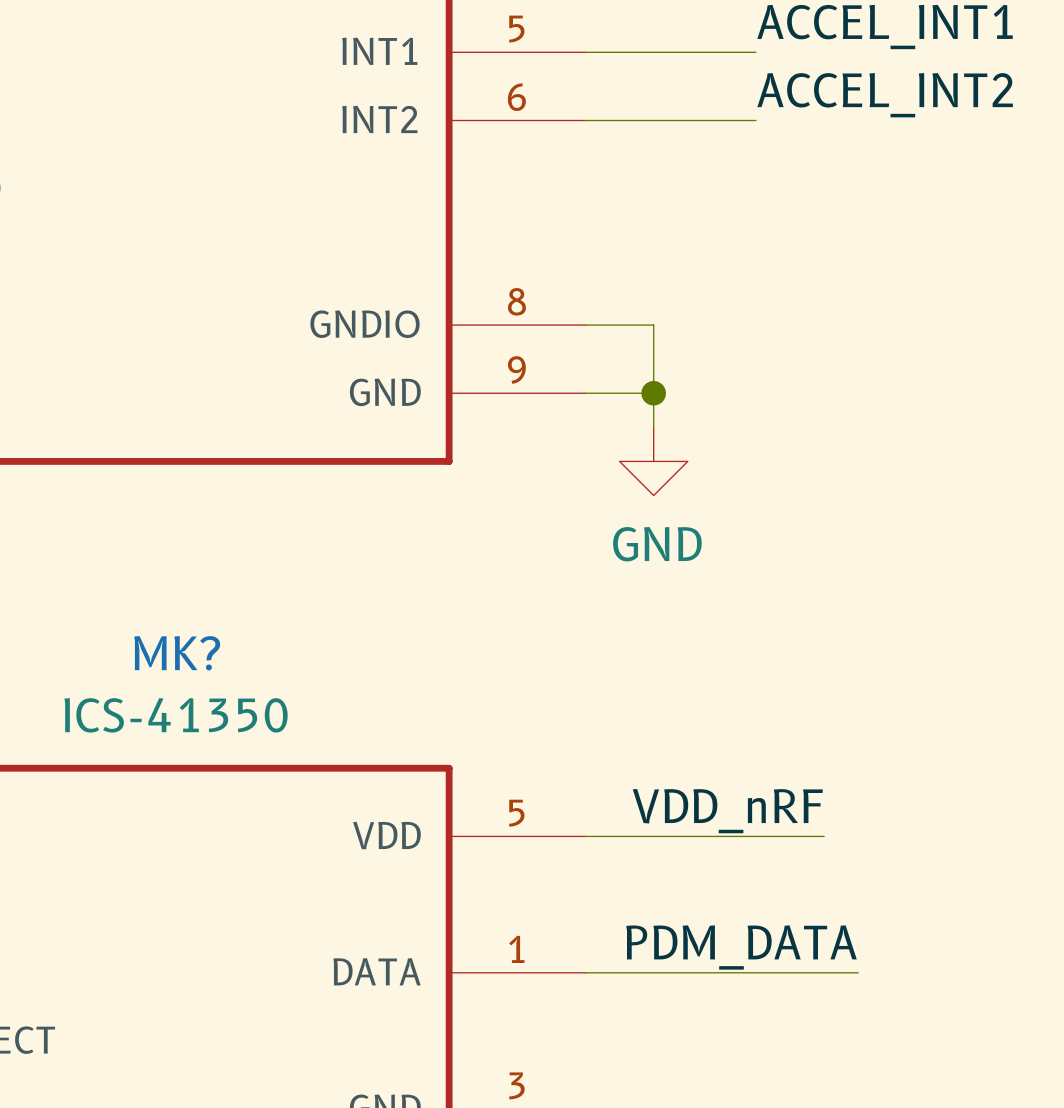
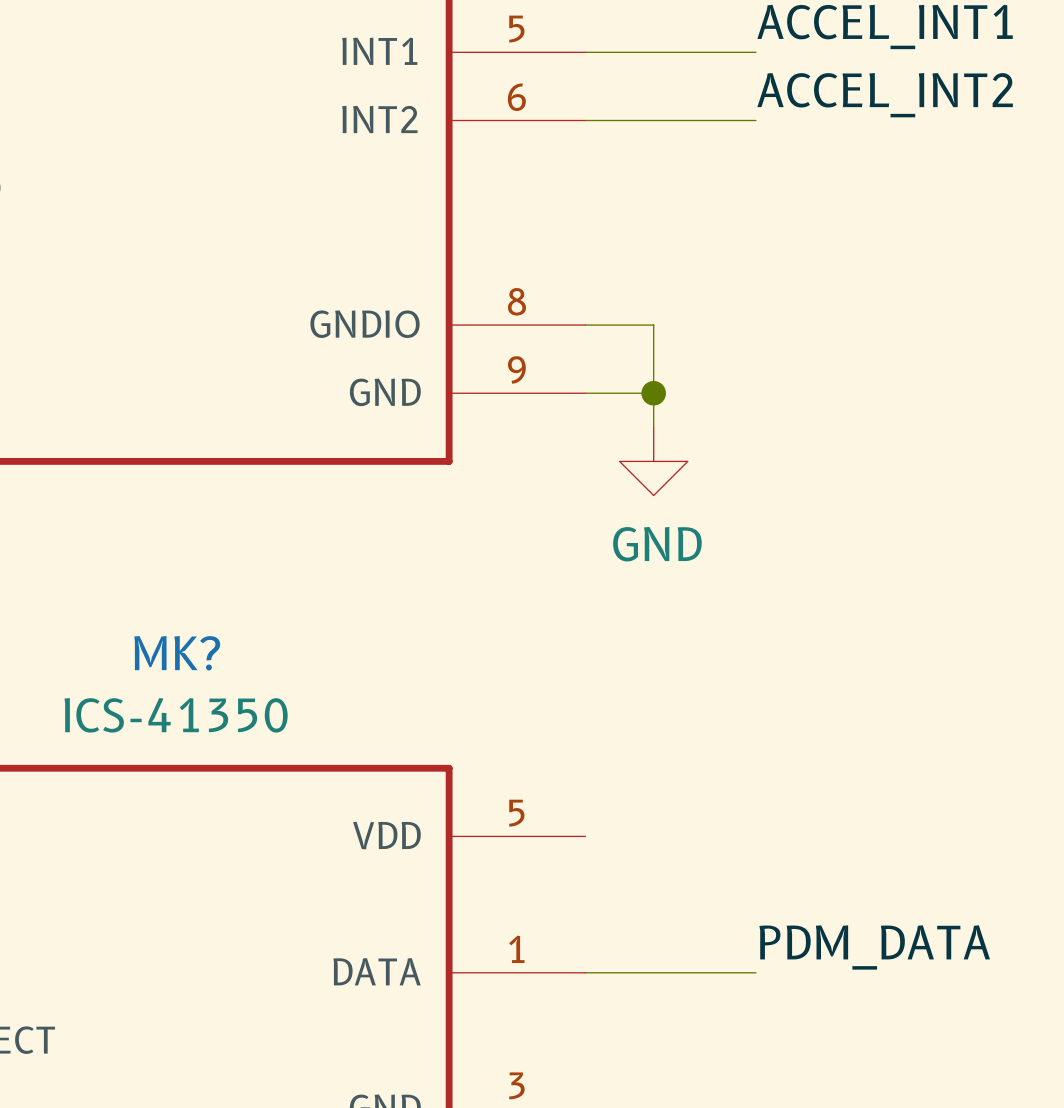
label: VDD_nRF (727, 811) -> none
wire: (585, 836) (824, 836) -> none
label position: PDM_DATA (741, 947) -> PDM_DATA (874, 947)
wire: (755, 972) (858, 972) -> none

